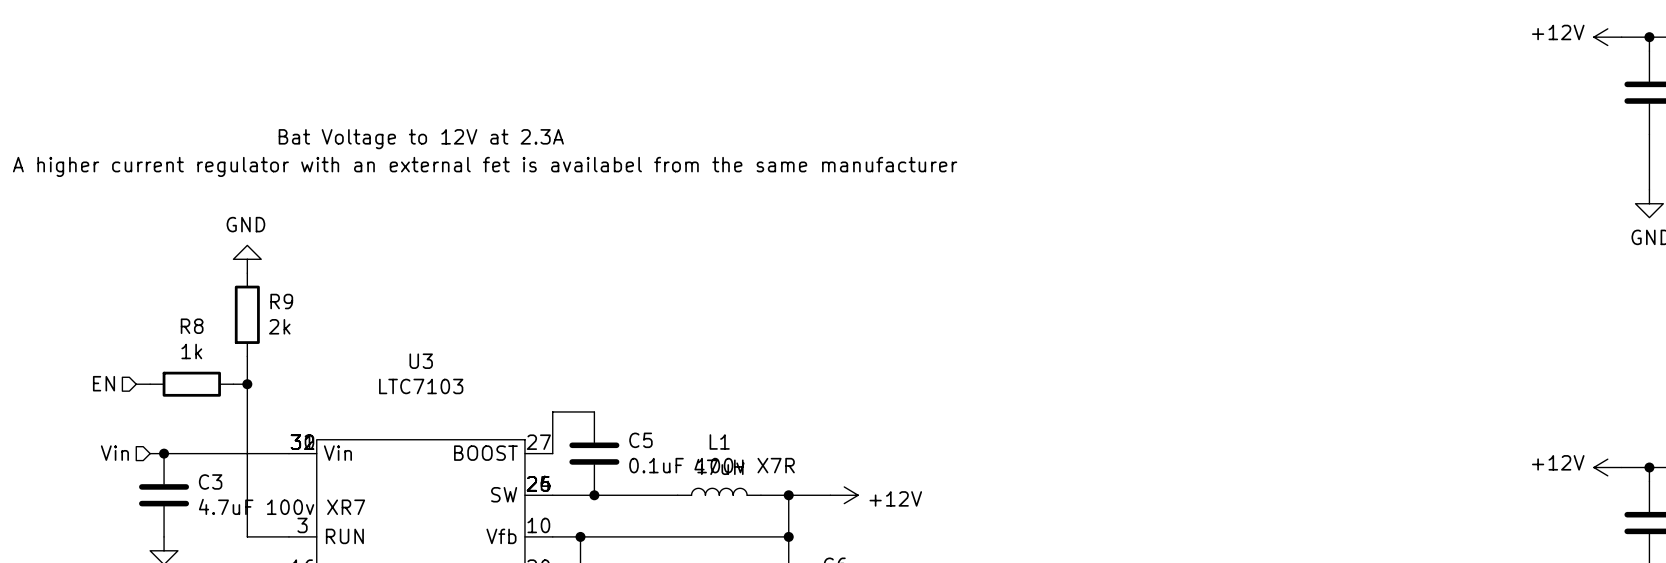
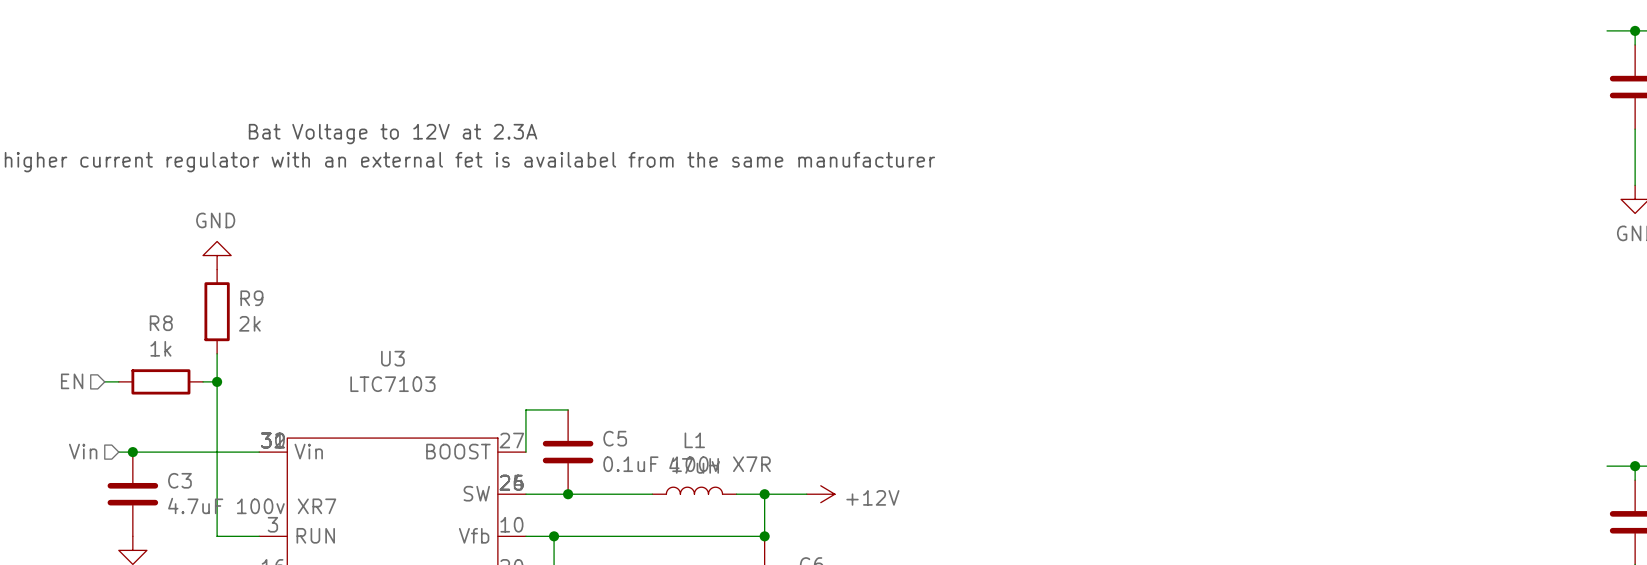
power symbol: +12V (1607, 37) -> none
power symbol: +12V (1607, 467) -> none

